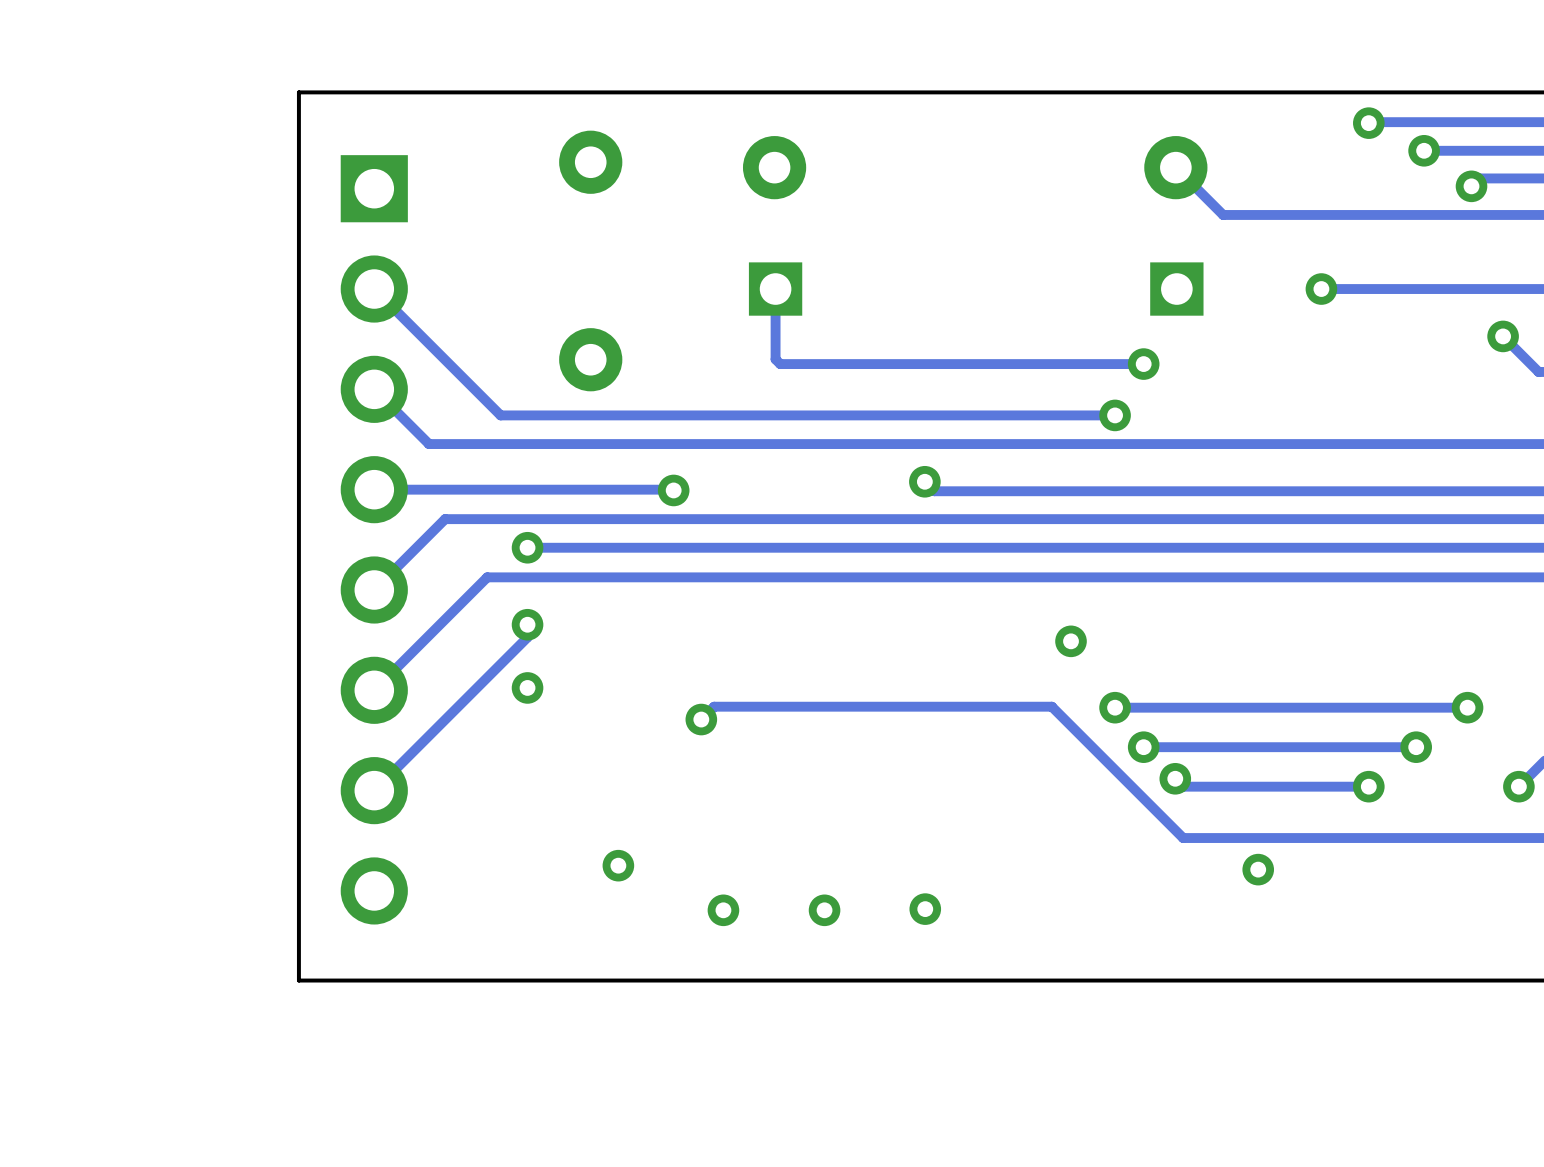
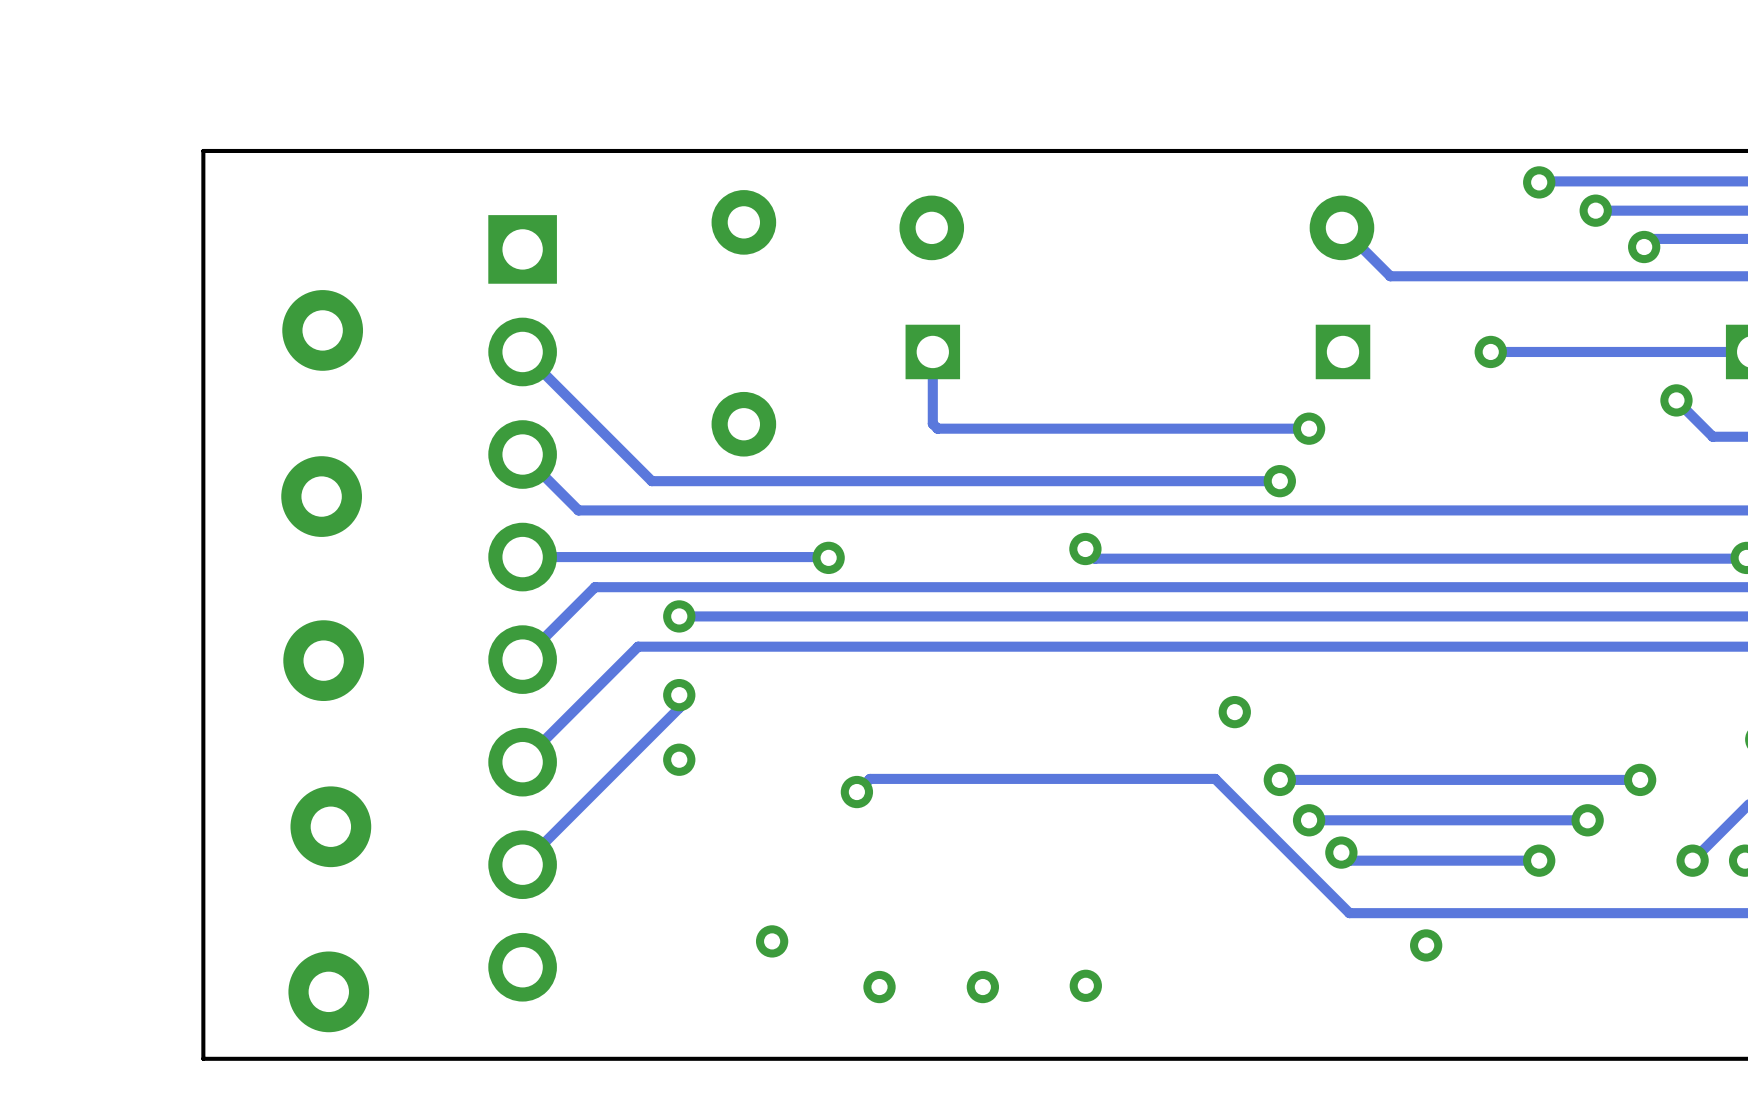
board edge: (298, 92) (298, 980) -> (445, 150) (203, 150) (203, 1058) (445, 1058)
part: none -> (322, 330)
part: none -> (321, 496)
part: none -> (323, 660)
part: none -> (330, 826)
part: none -> (328, 991)

